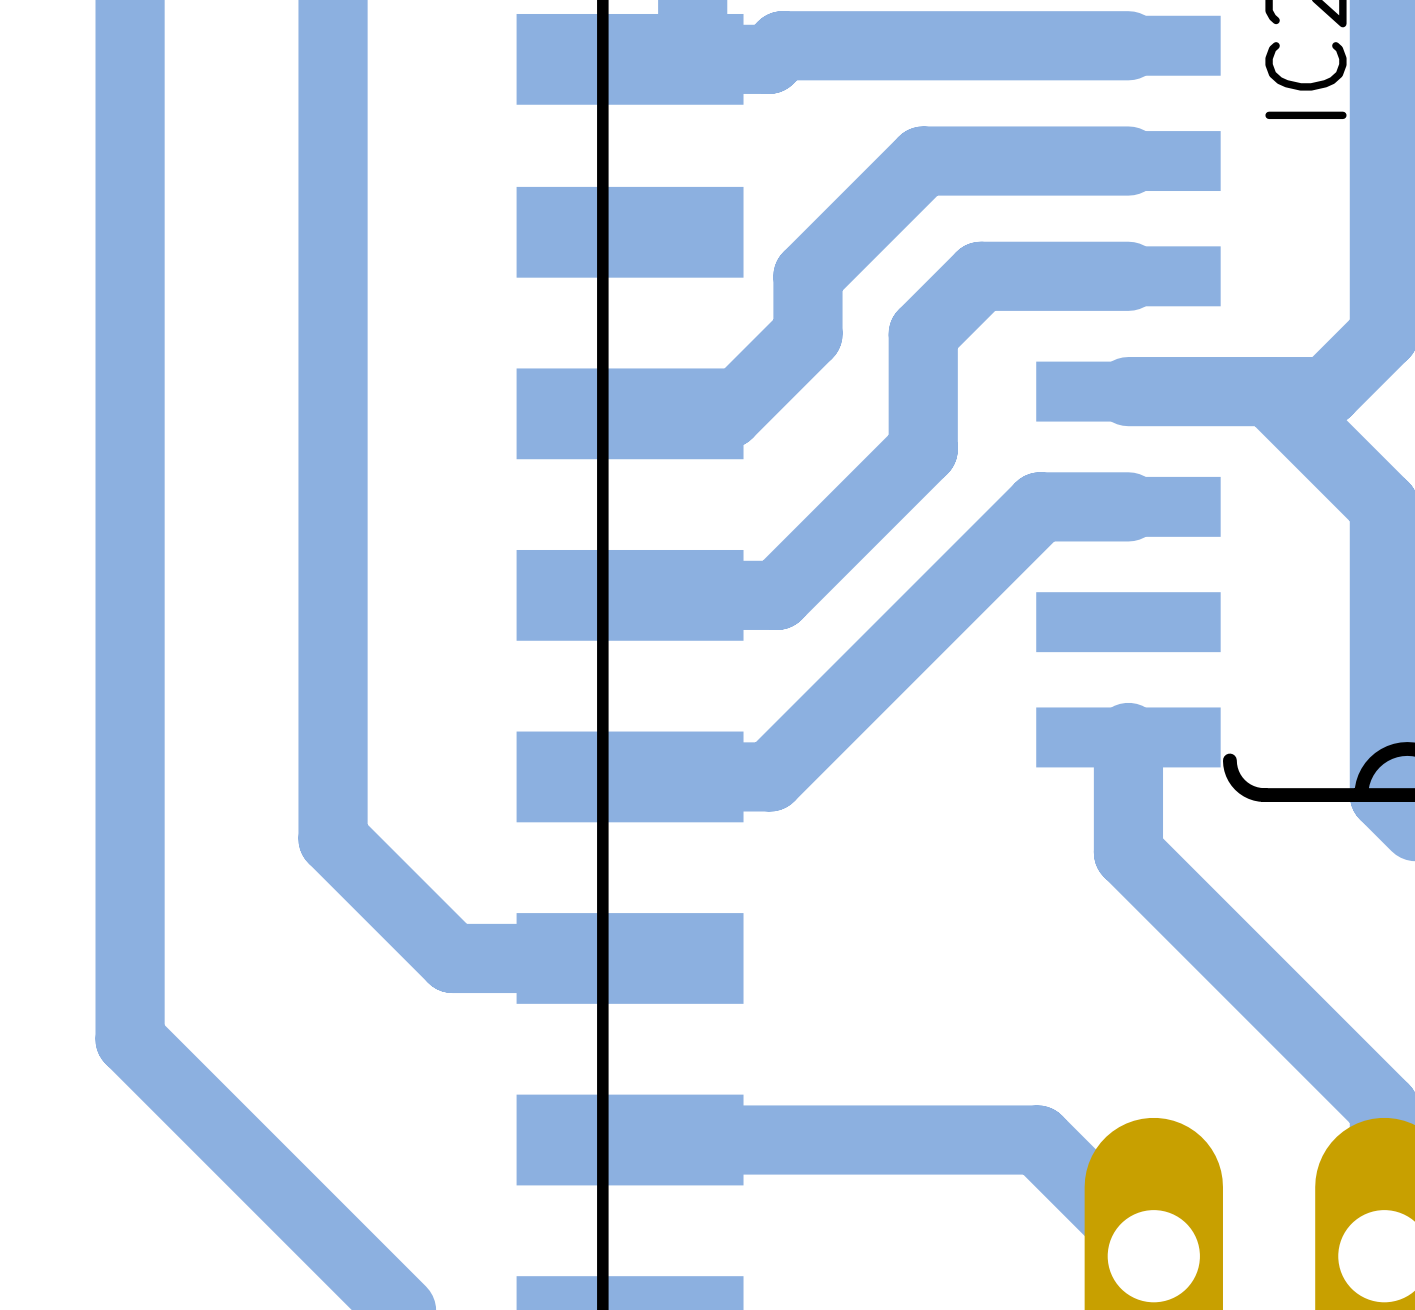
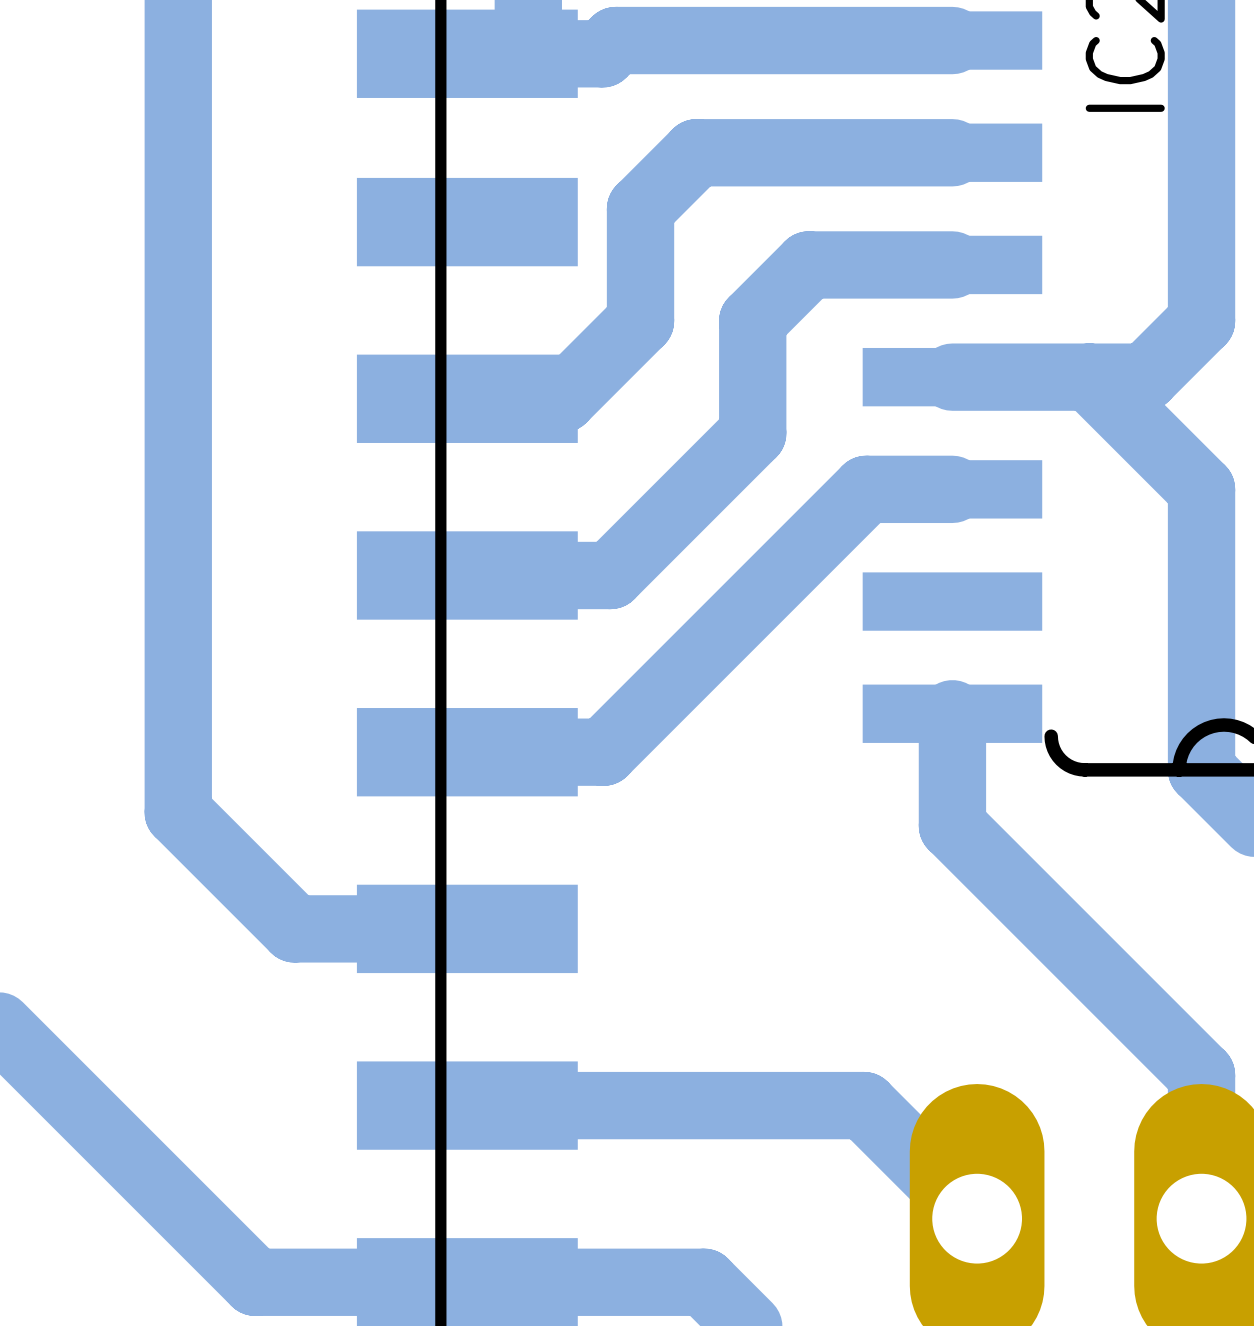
bottom track: (923, 161) (807, 276) -> (752, 152) (696, 152) (640, 208) (640, 264)

